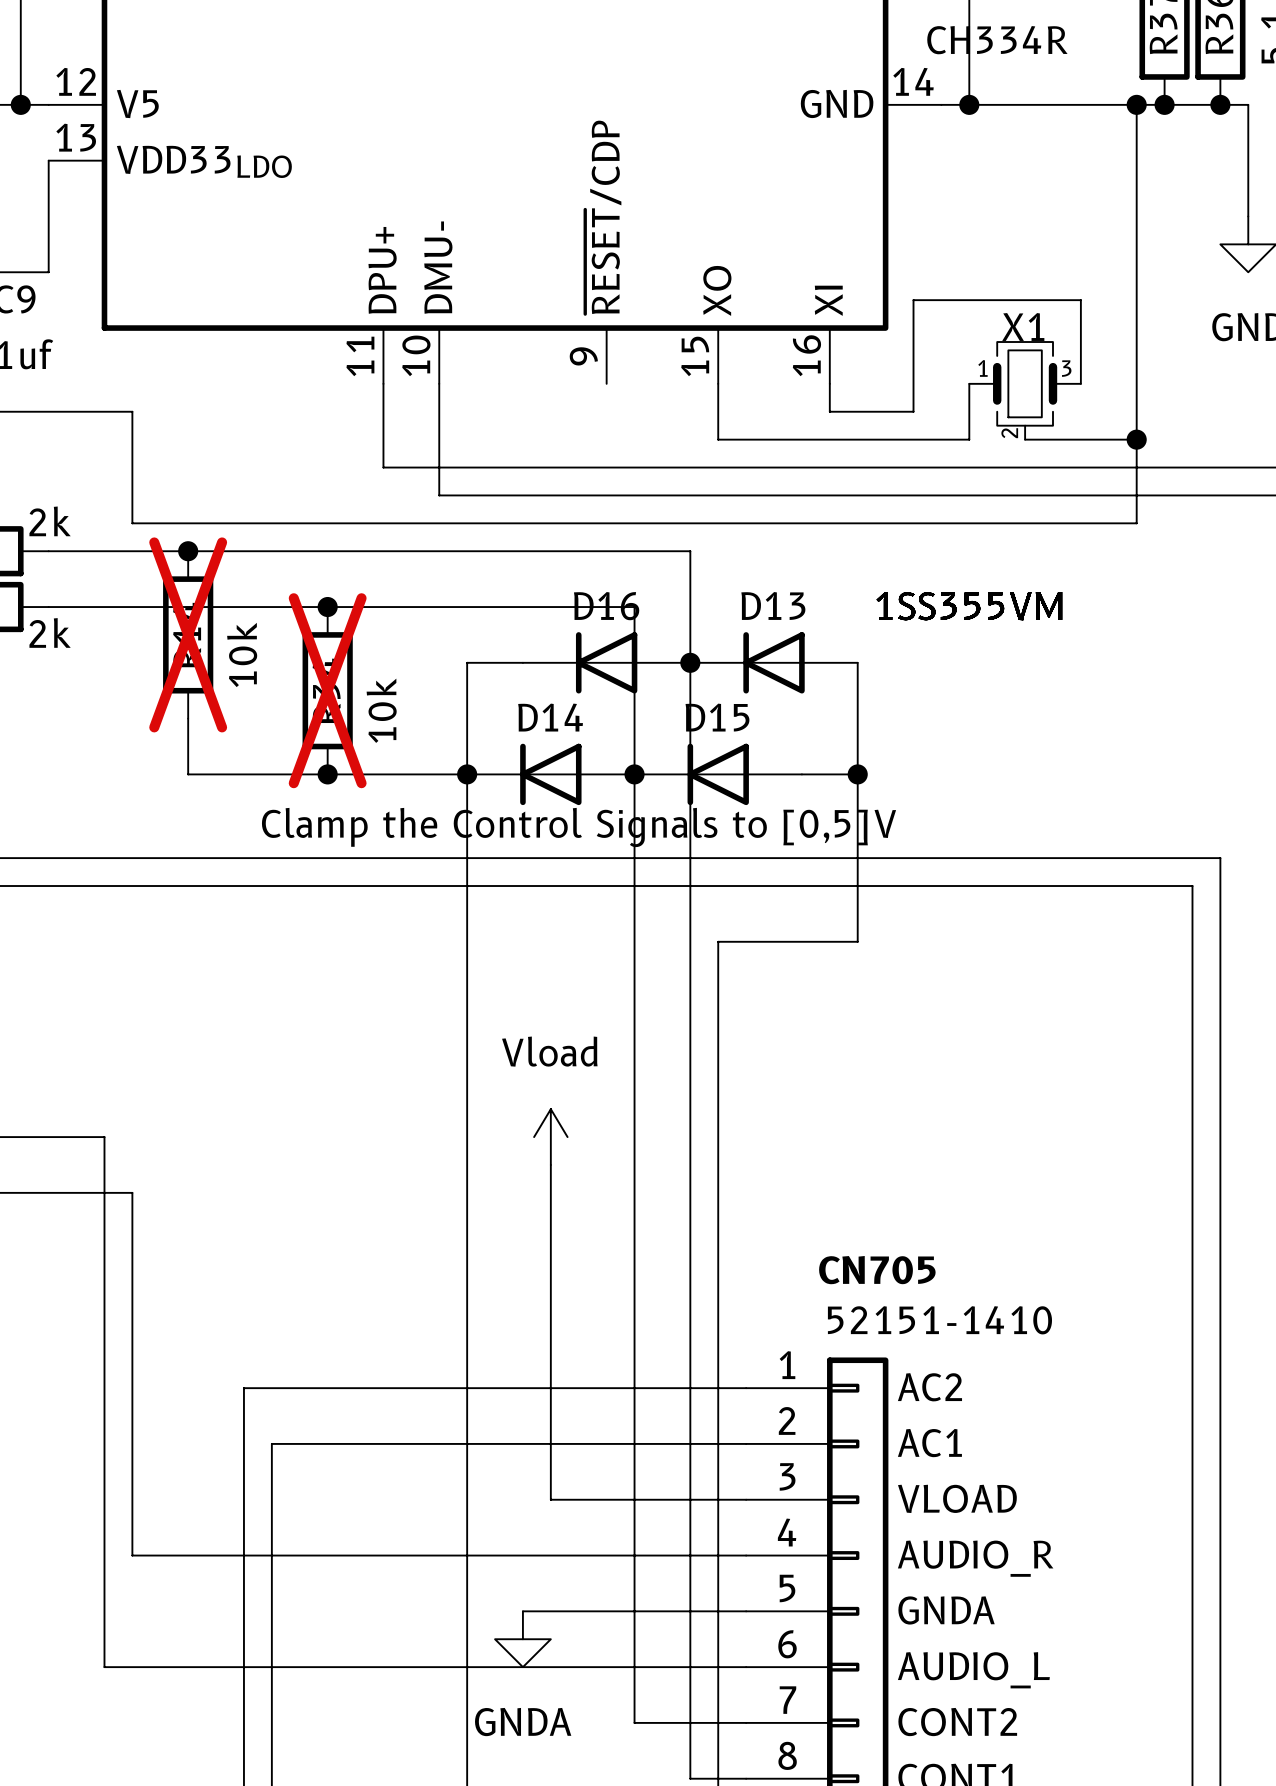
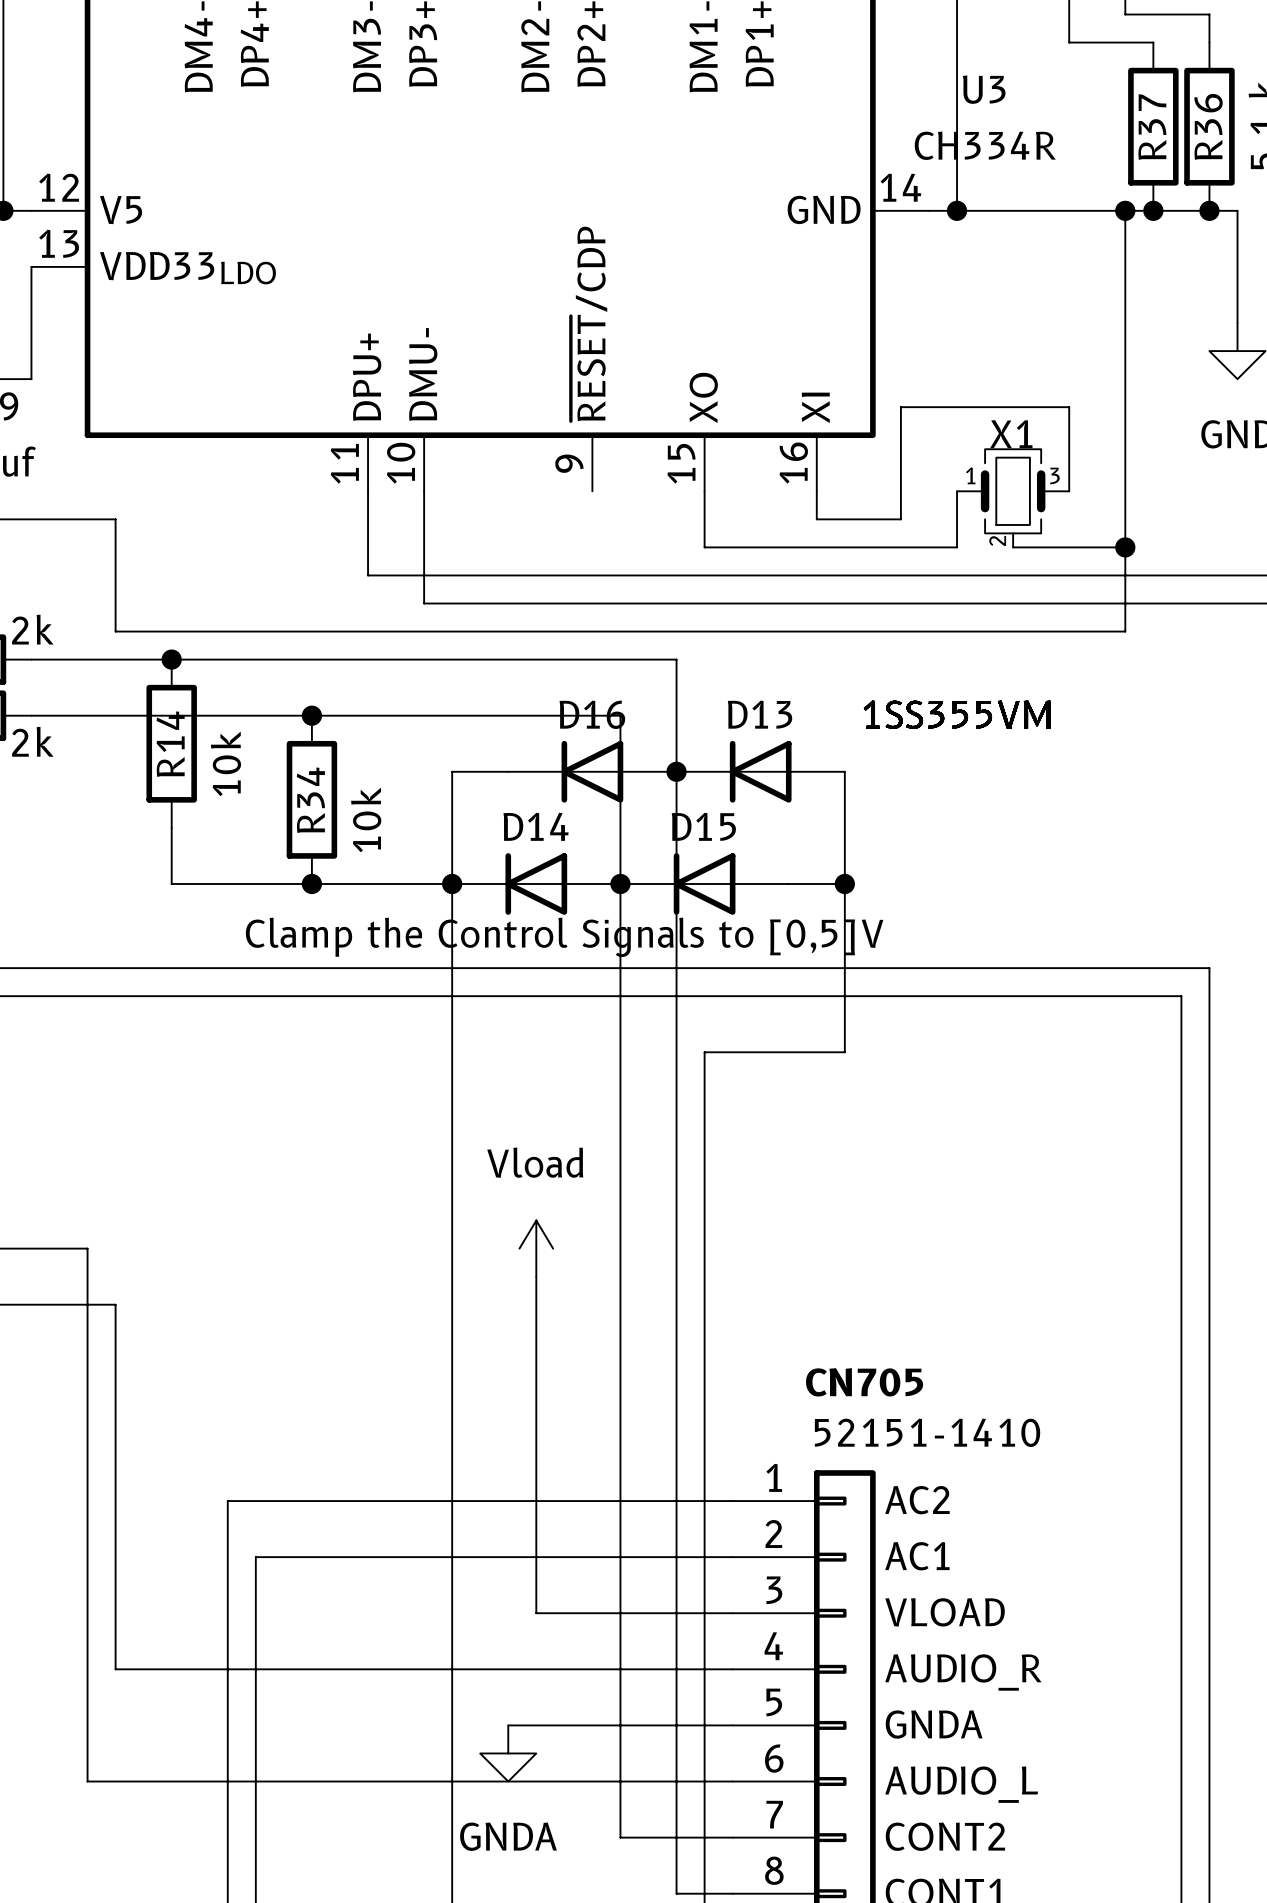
R14 do-not-place cross: (188, 634) -> none
R34 do-not-place cross: (327, 690) -> none

